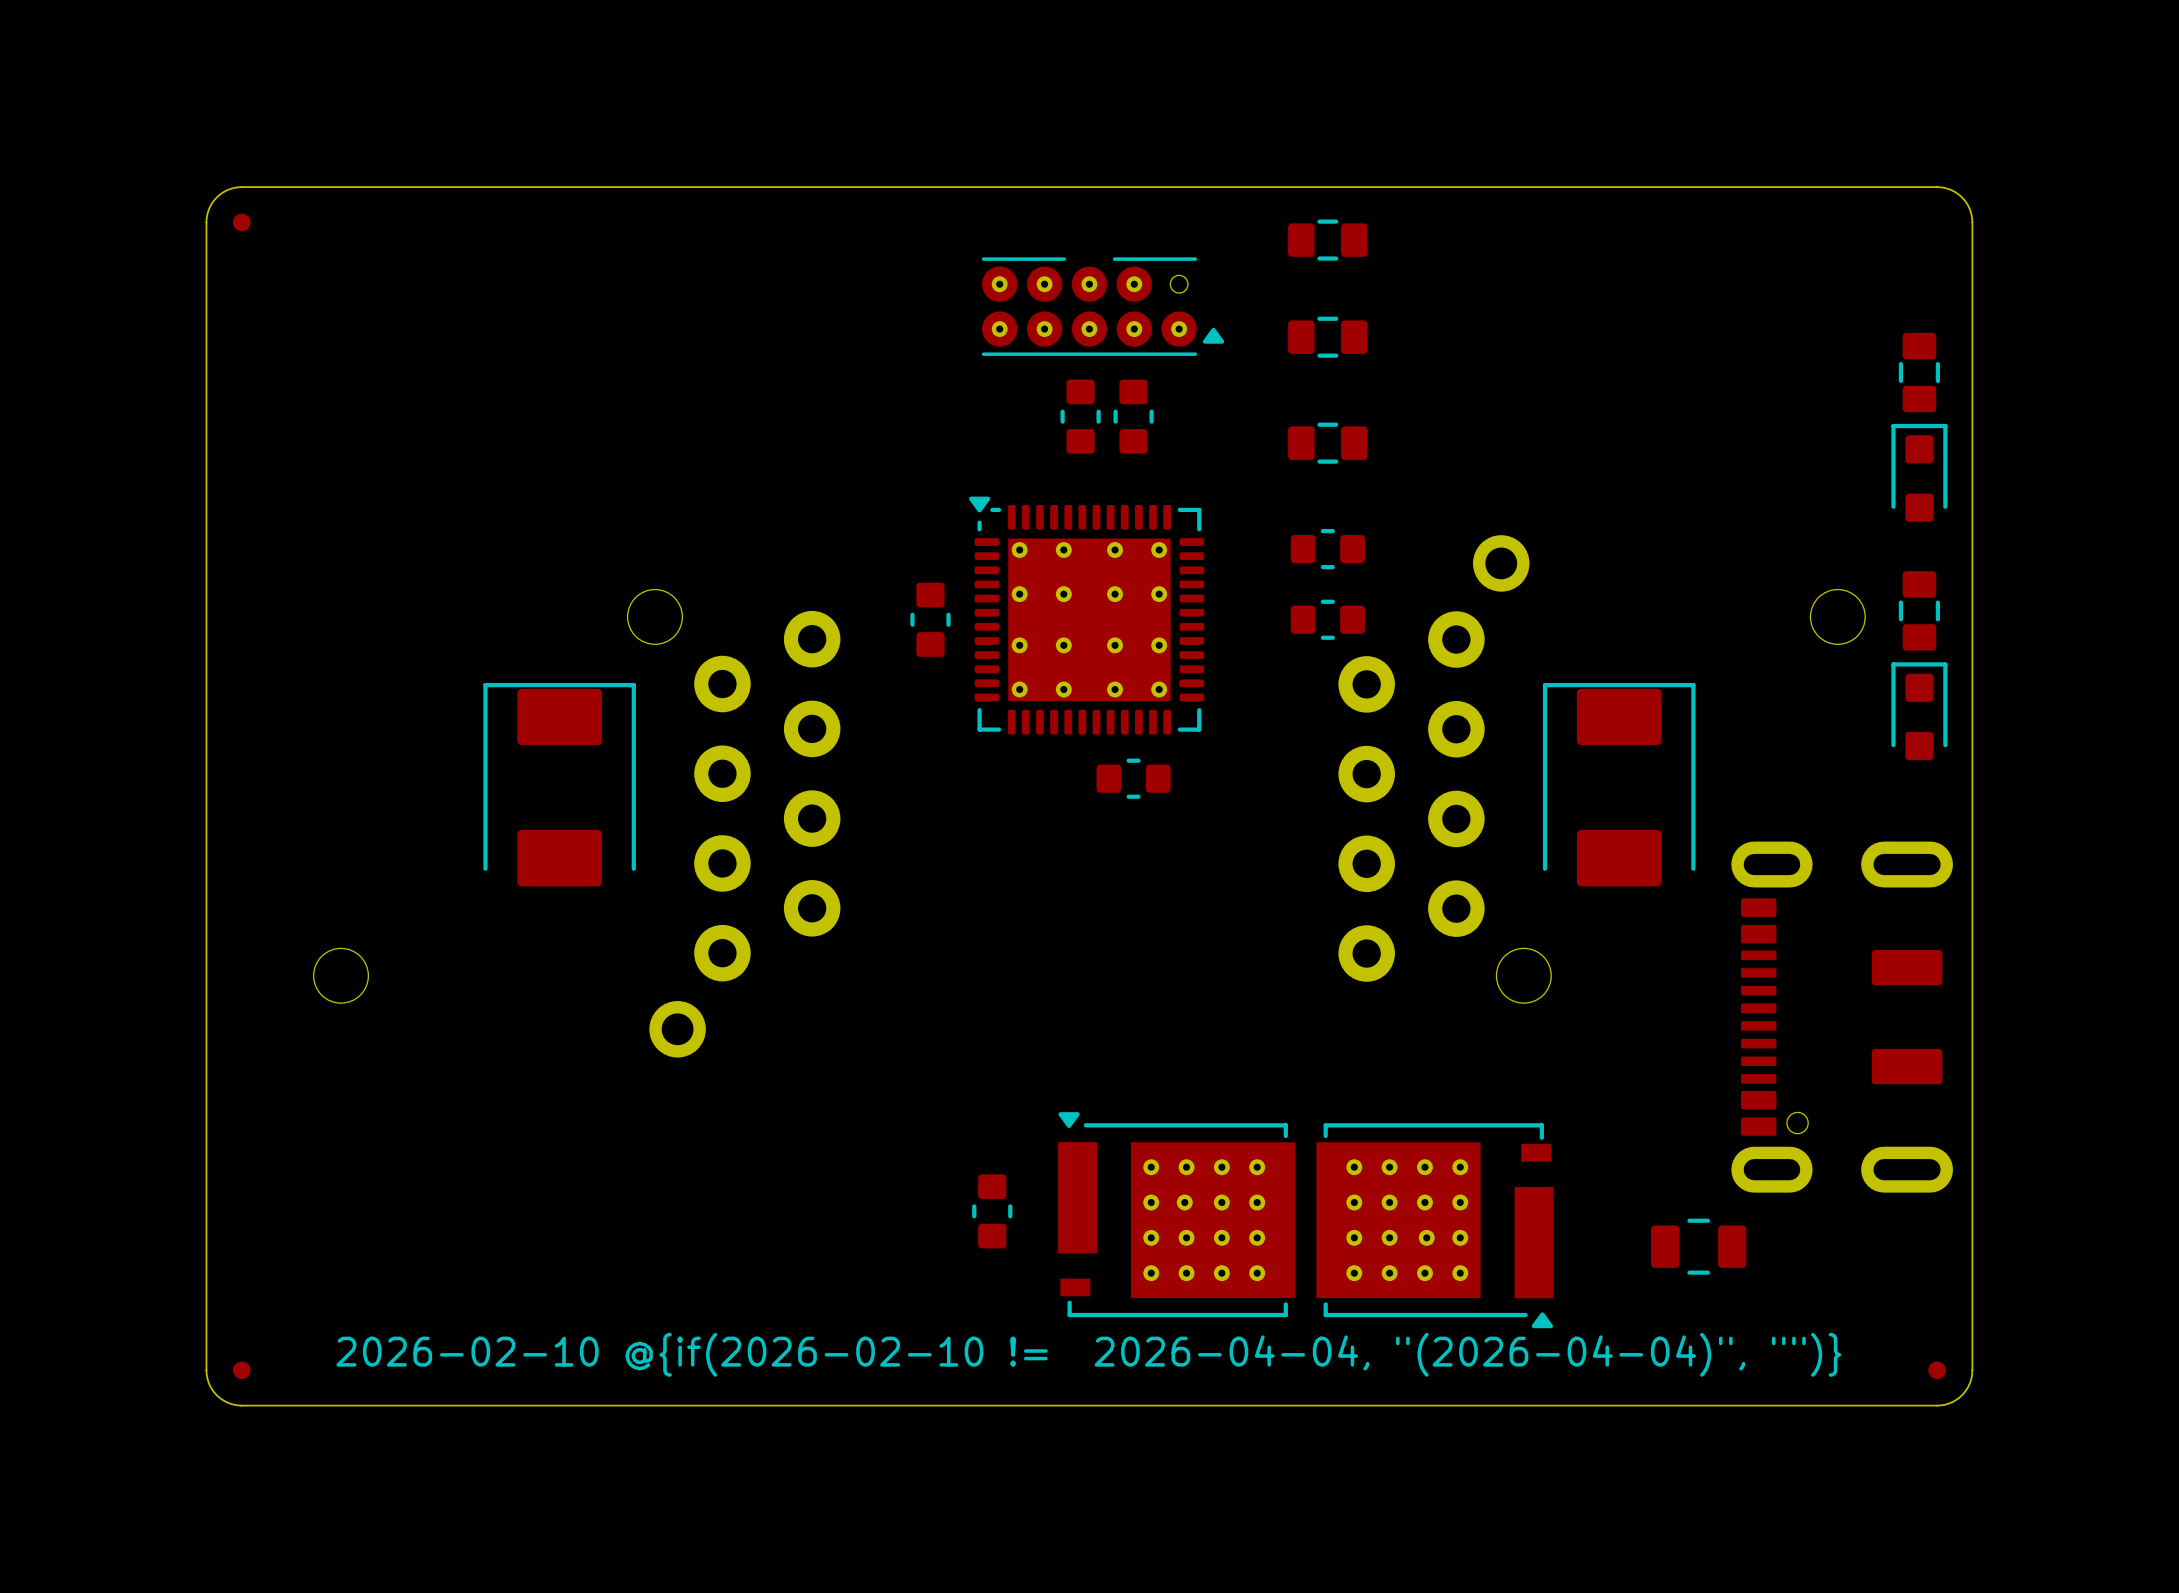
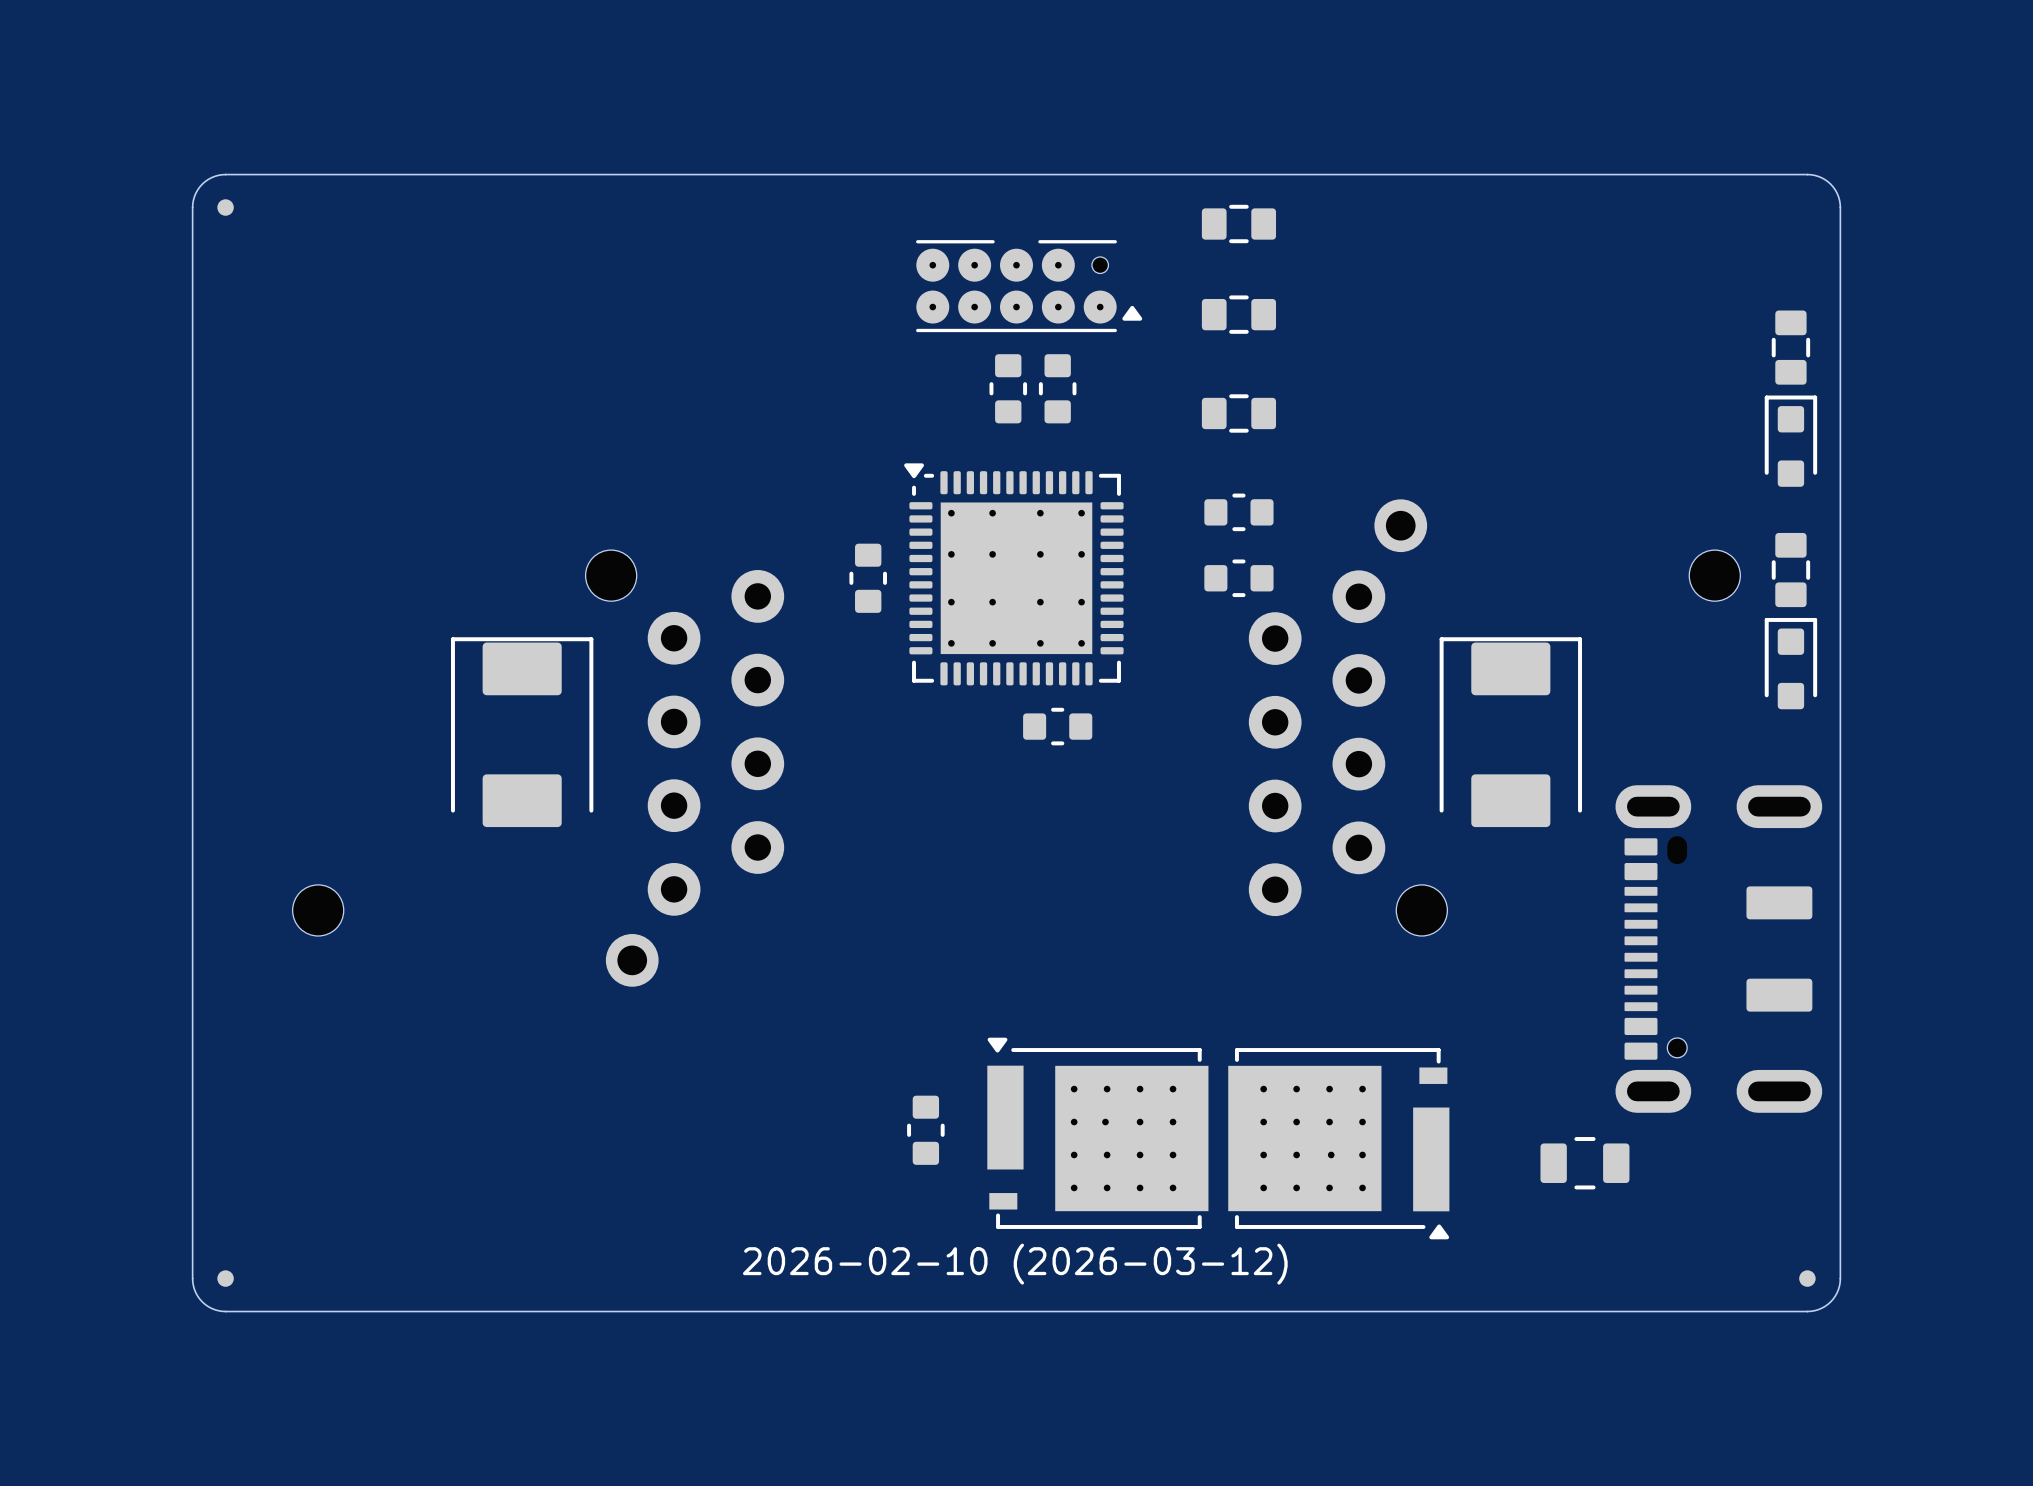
drawing shape: [336, 1332, 1842, 1377] -> [742, 1243, 1288, 1285]

